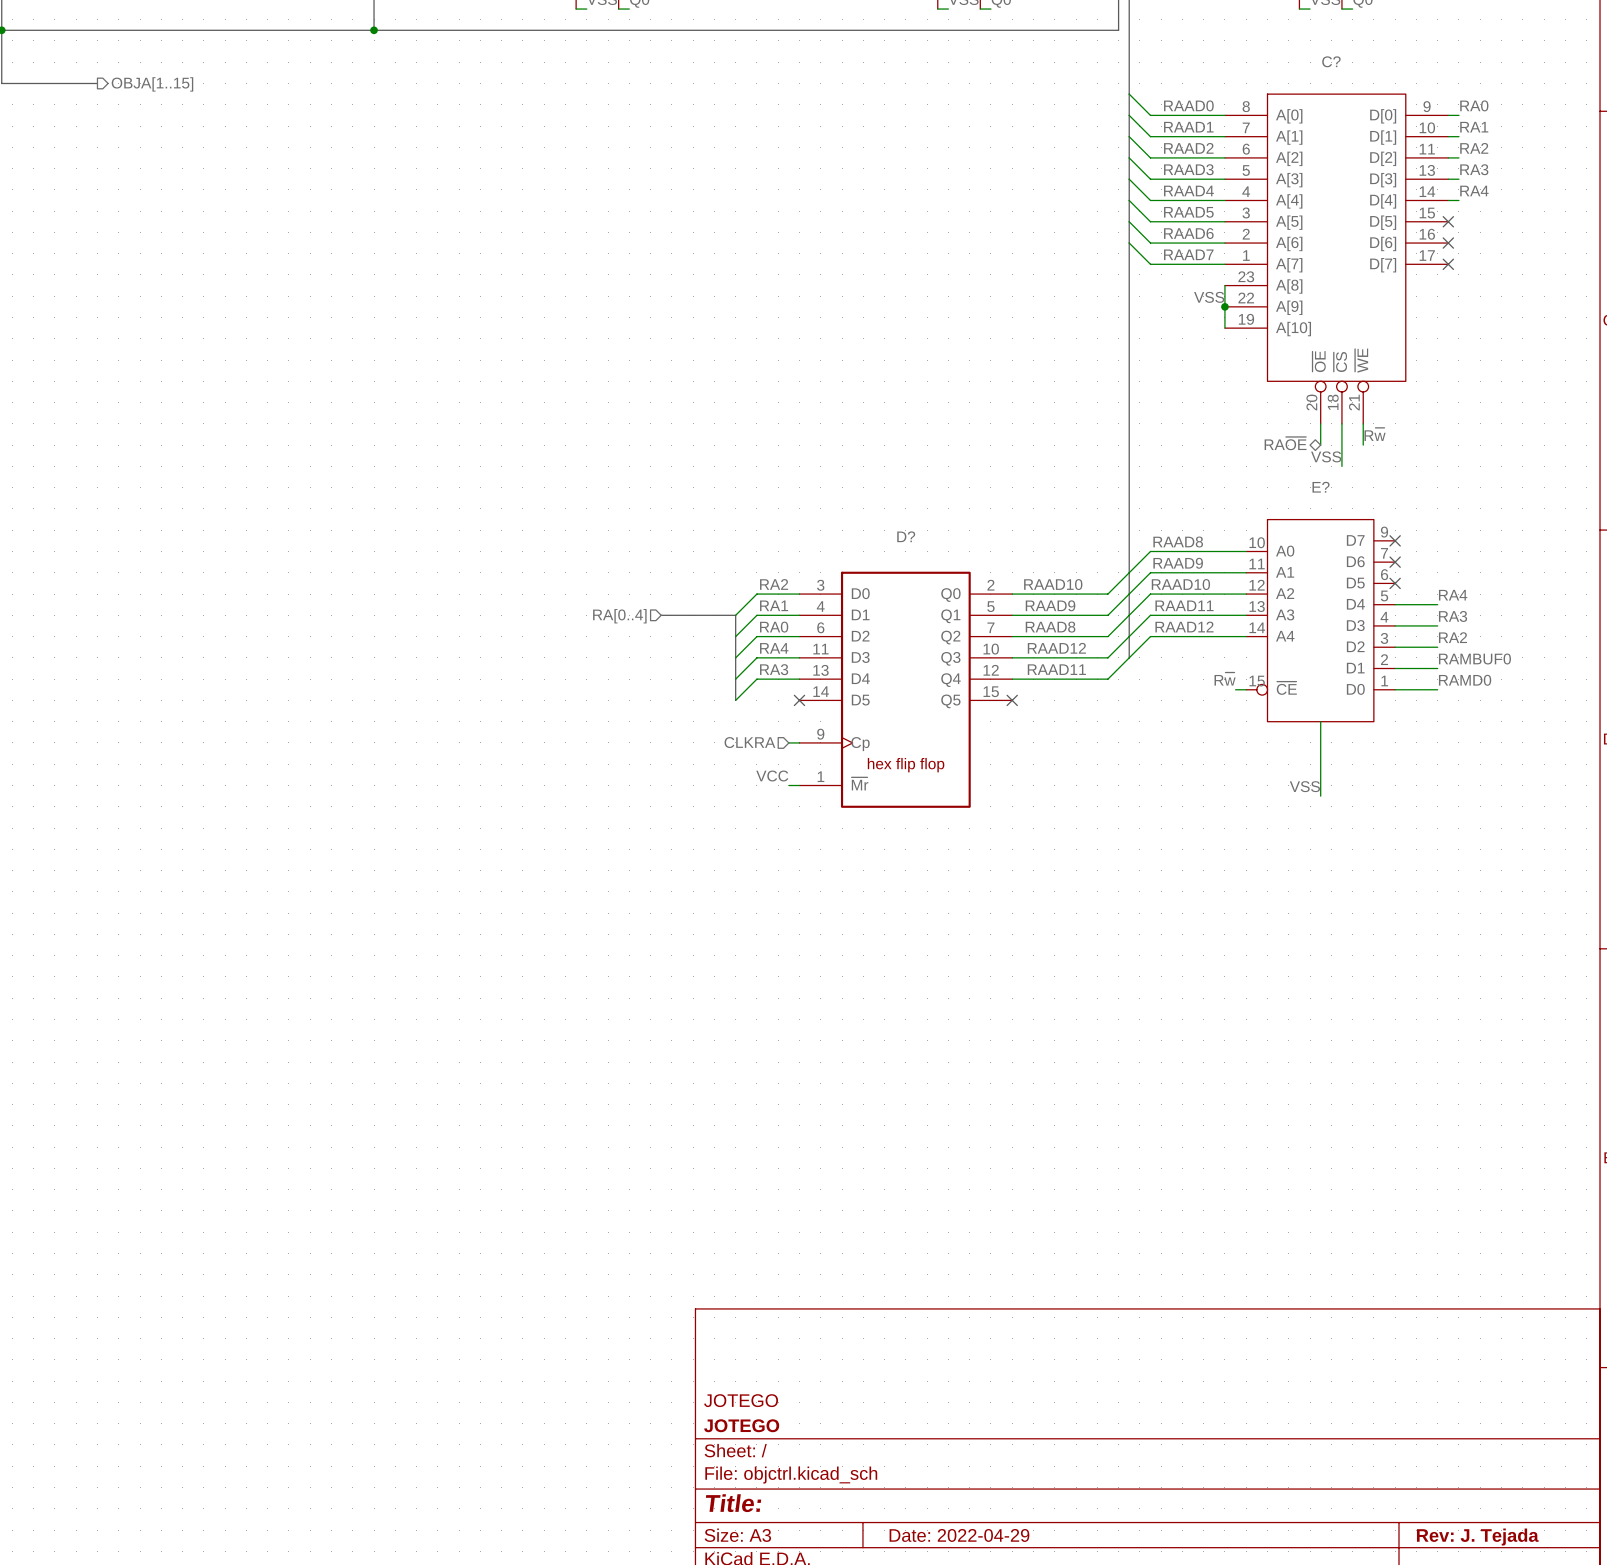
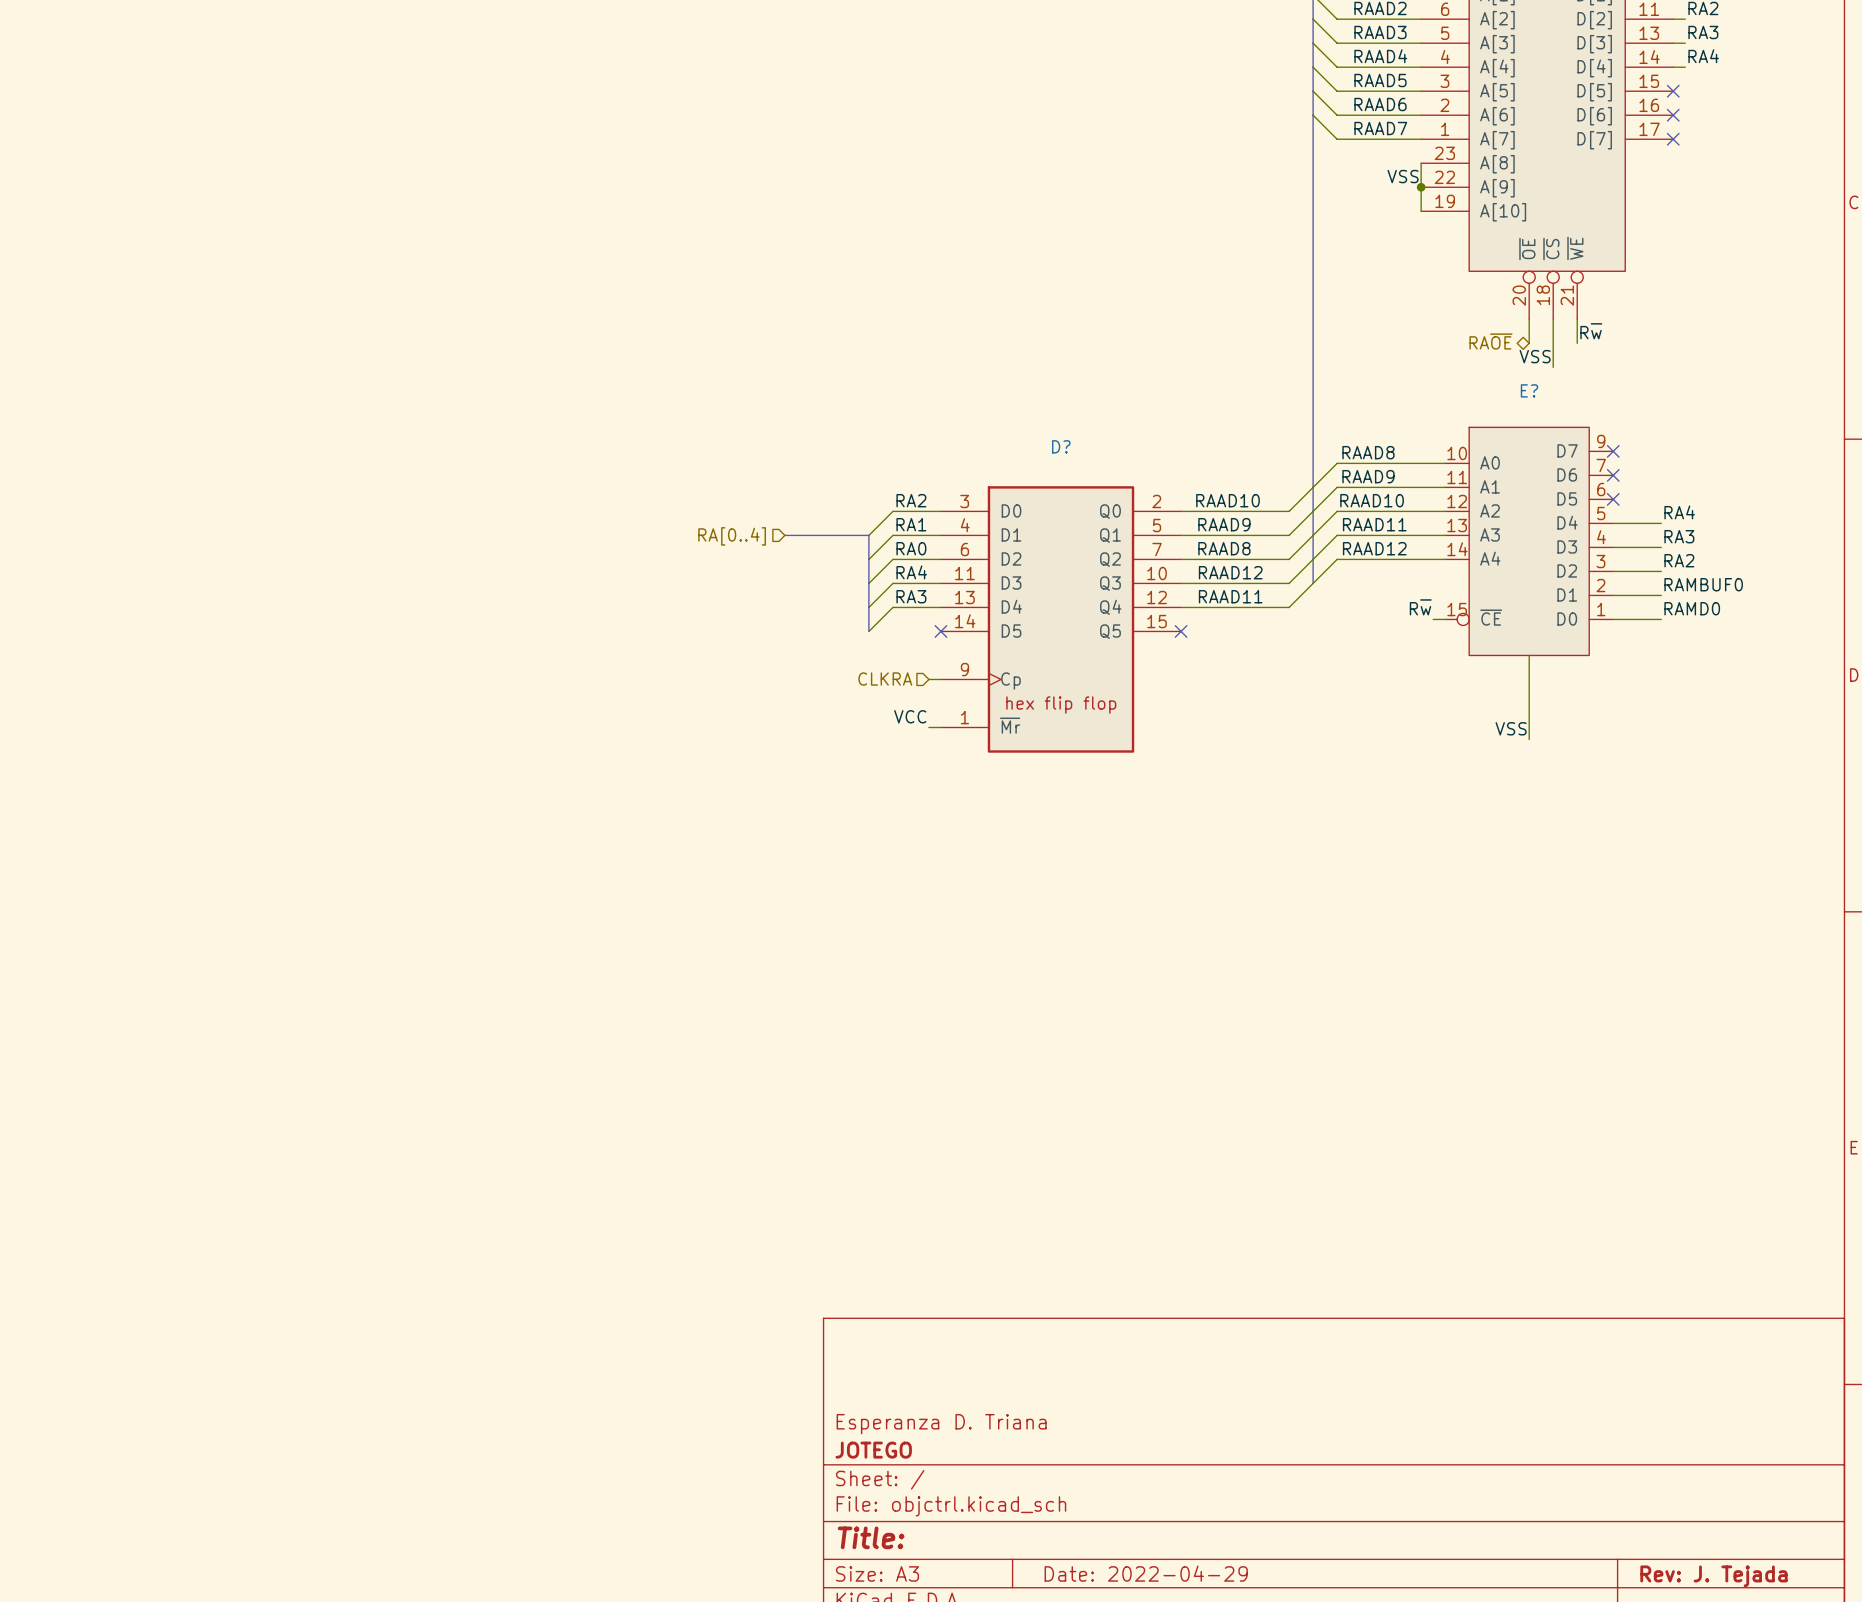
title block: JOTEGO (741, 1400) -> Esperanza D. Triana (941, 1424)

